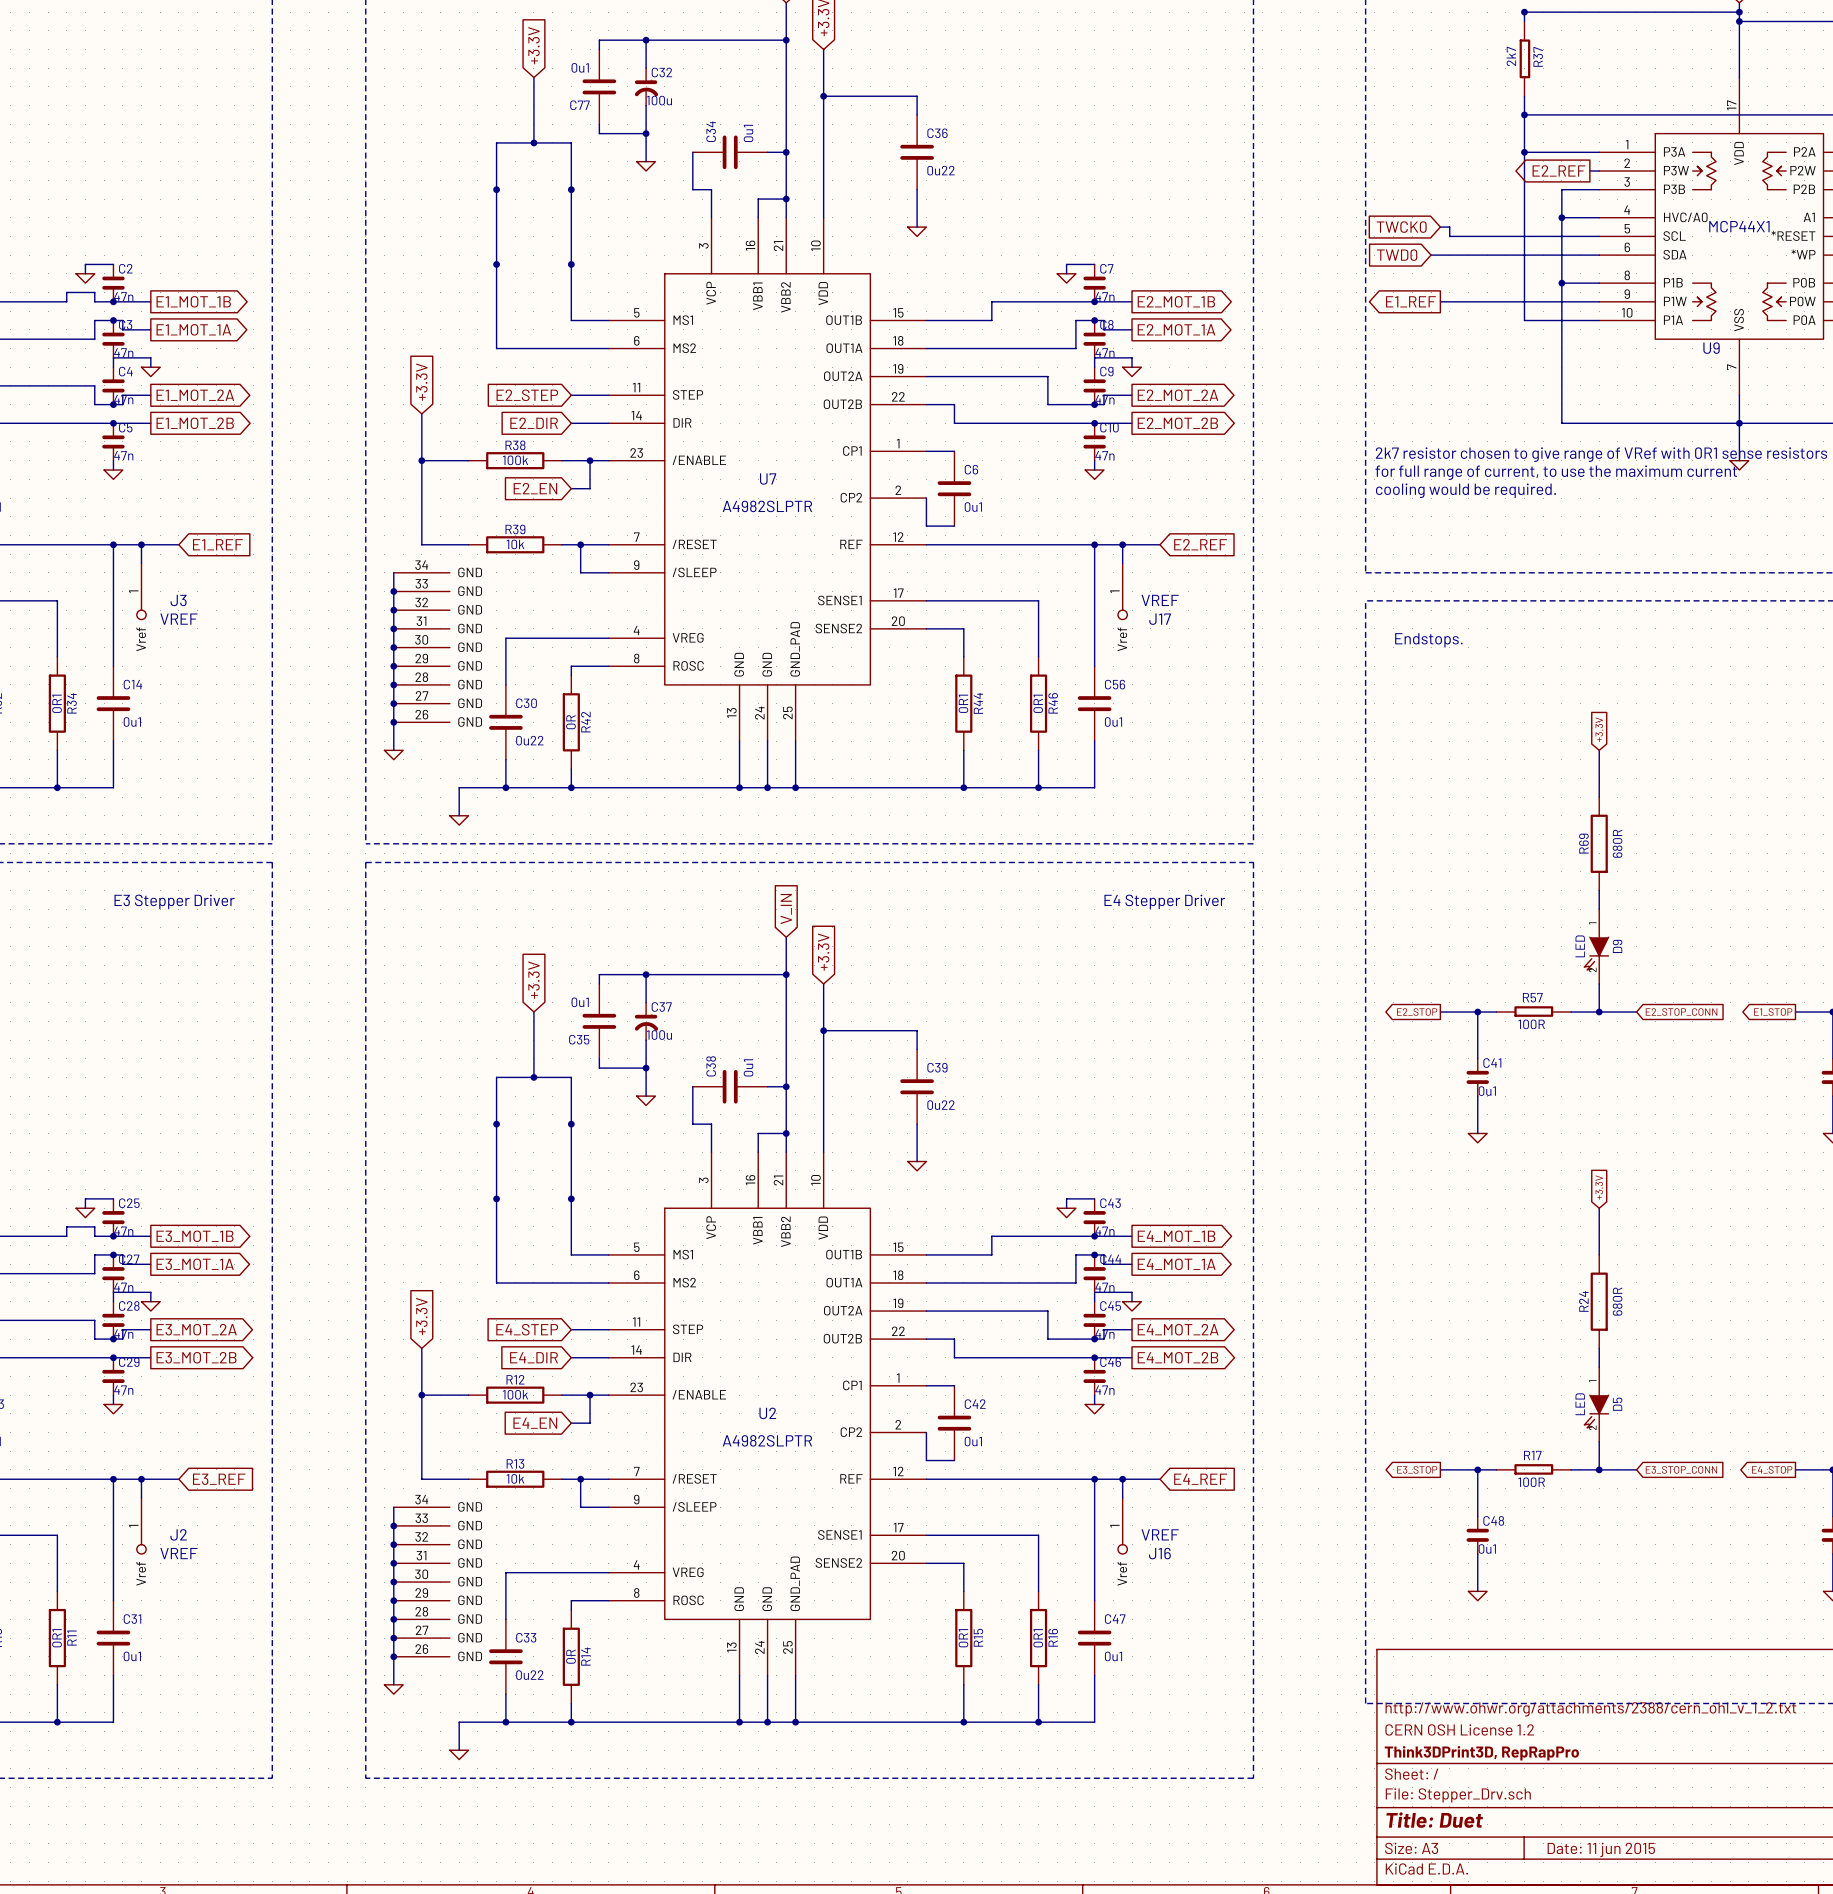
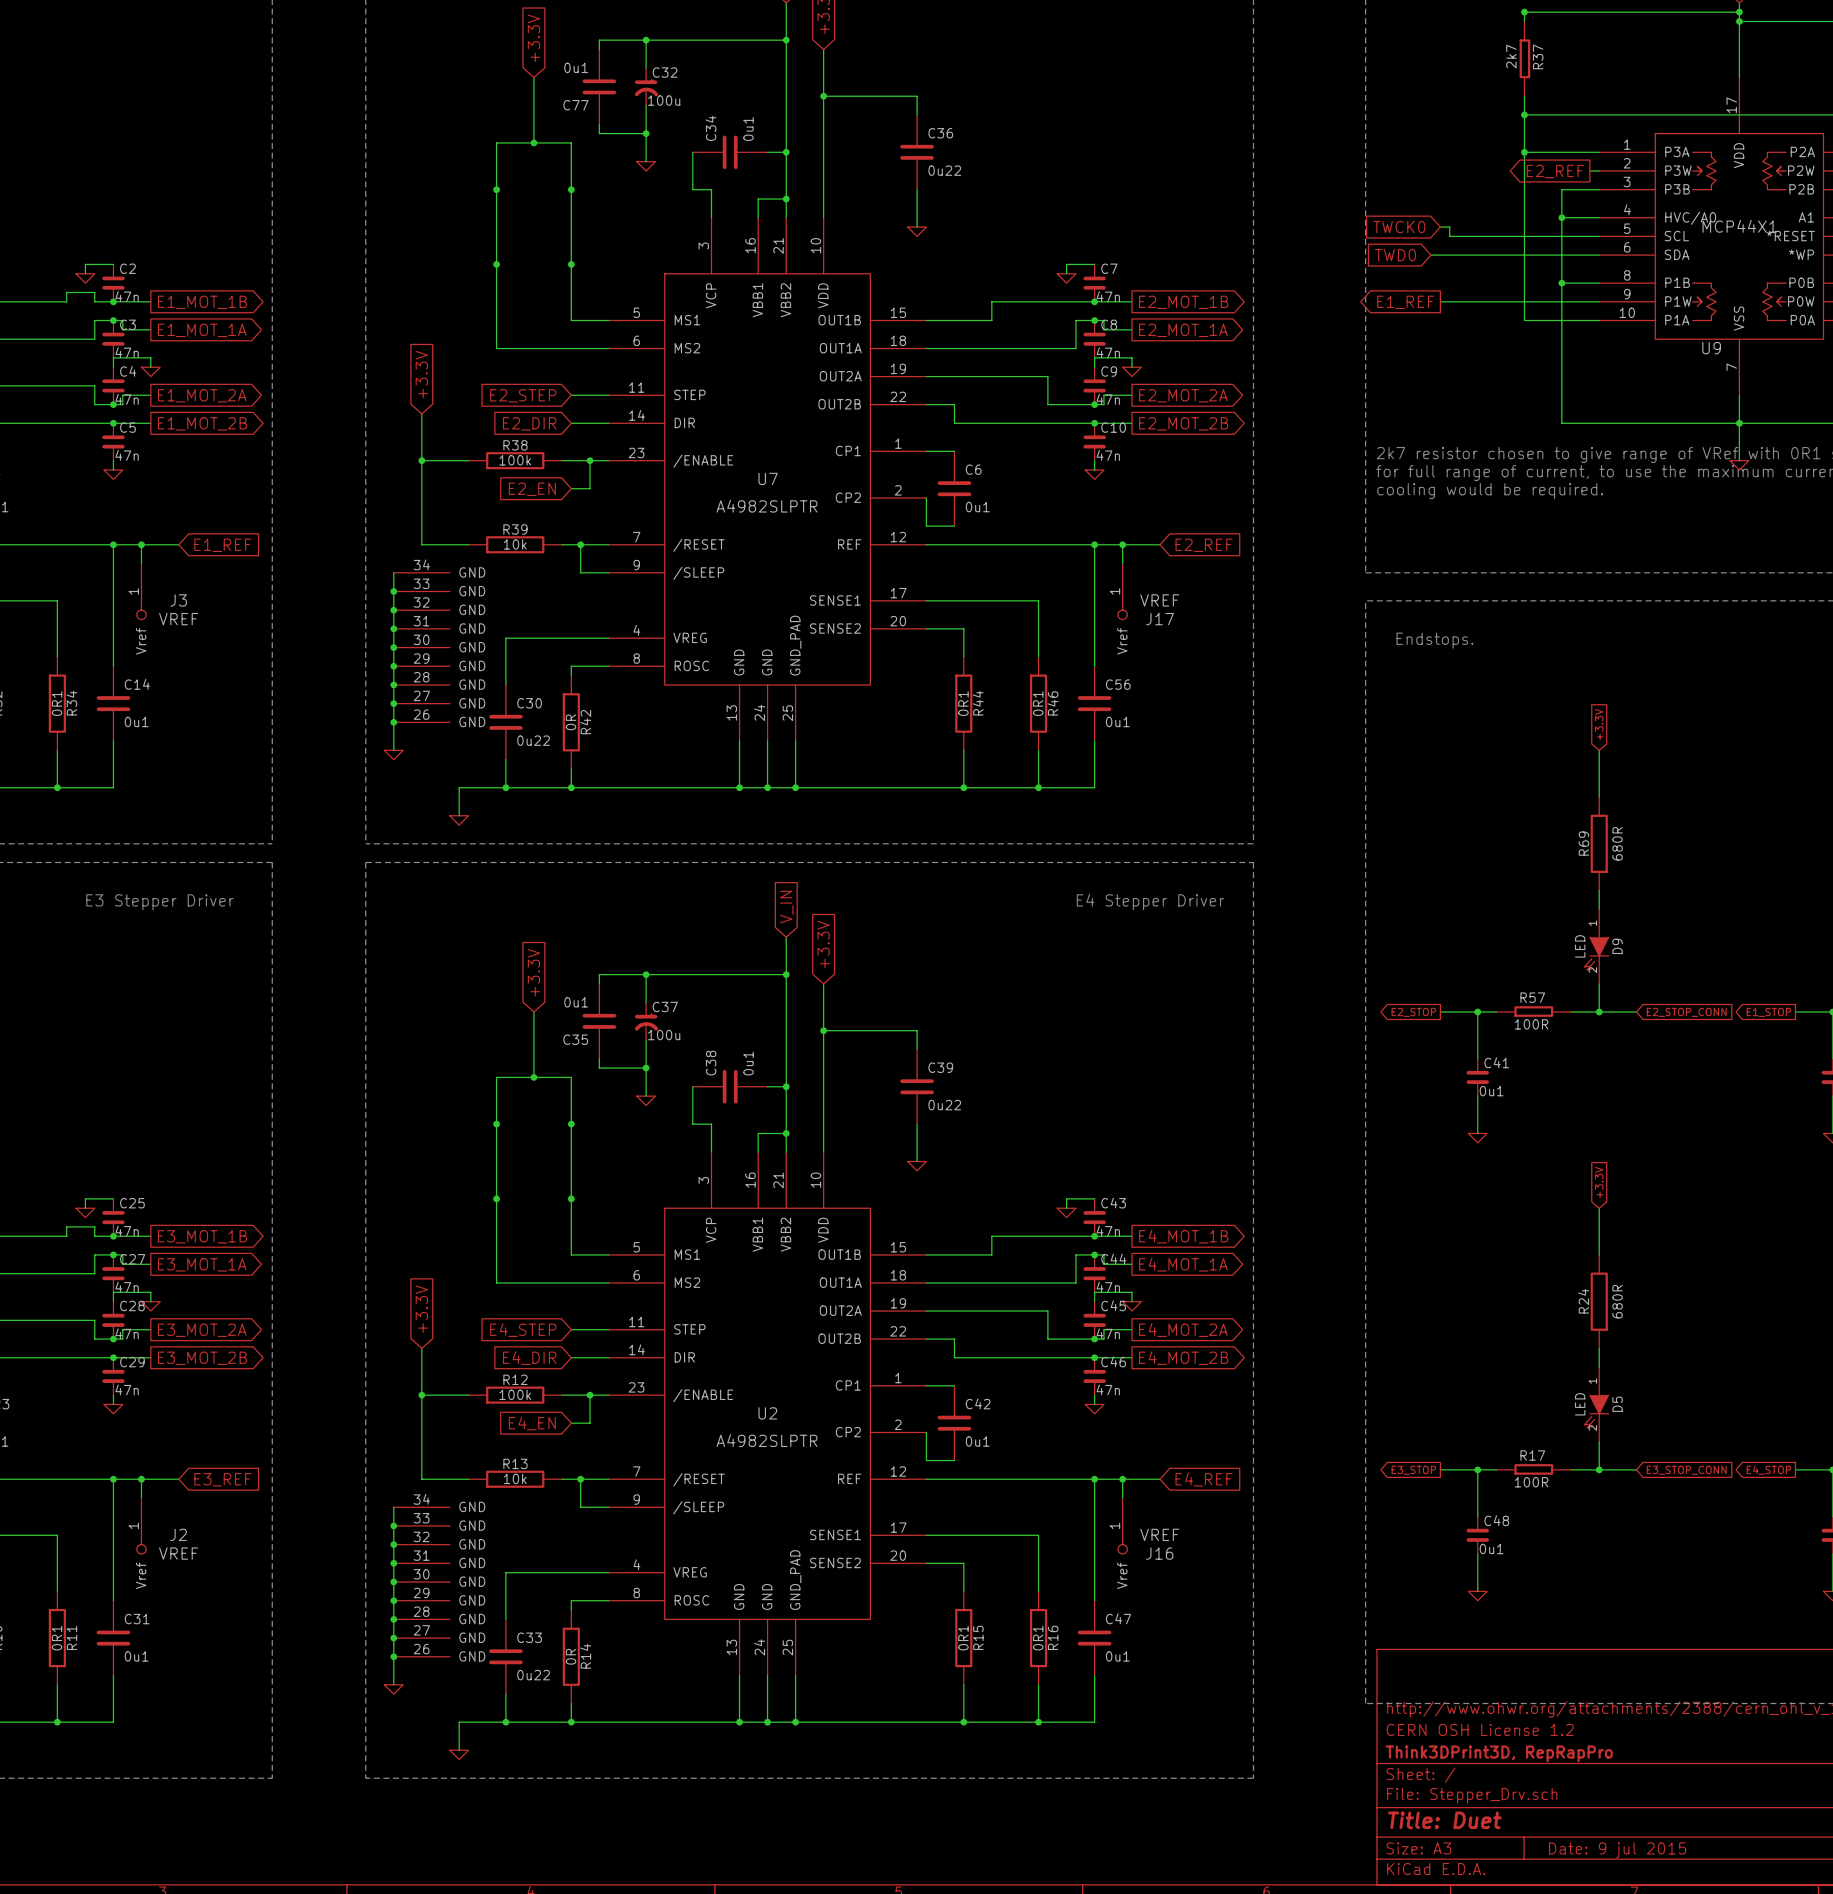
title block: Date: 11 jun 2015 (1601, 1849) -> Date: 9 jul 2015 (1617, 1850)

